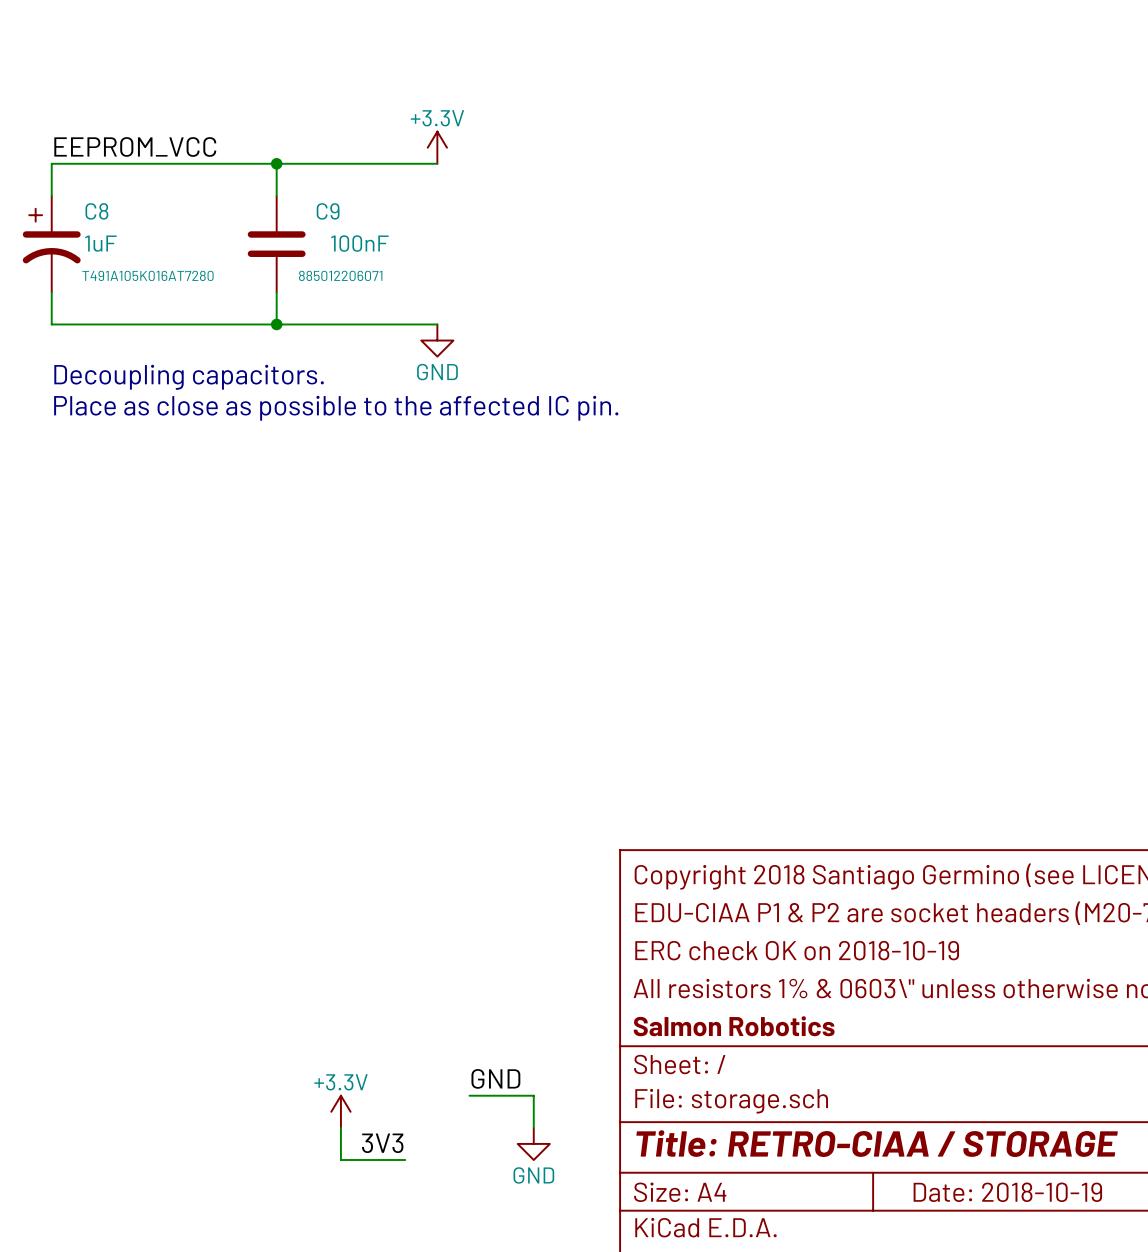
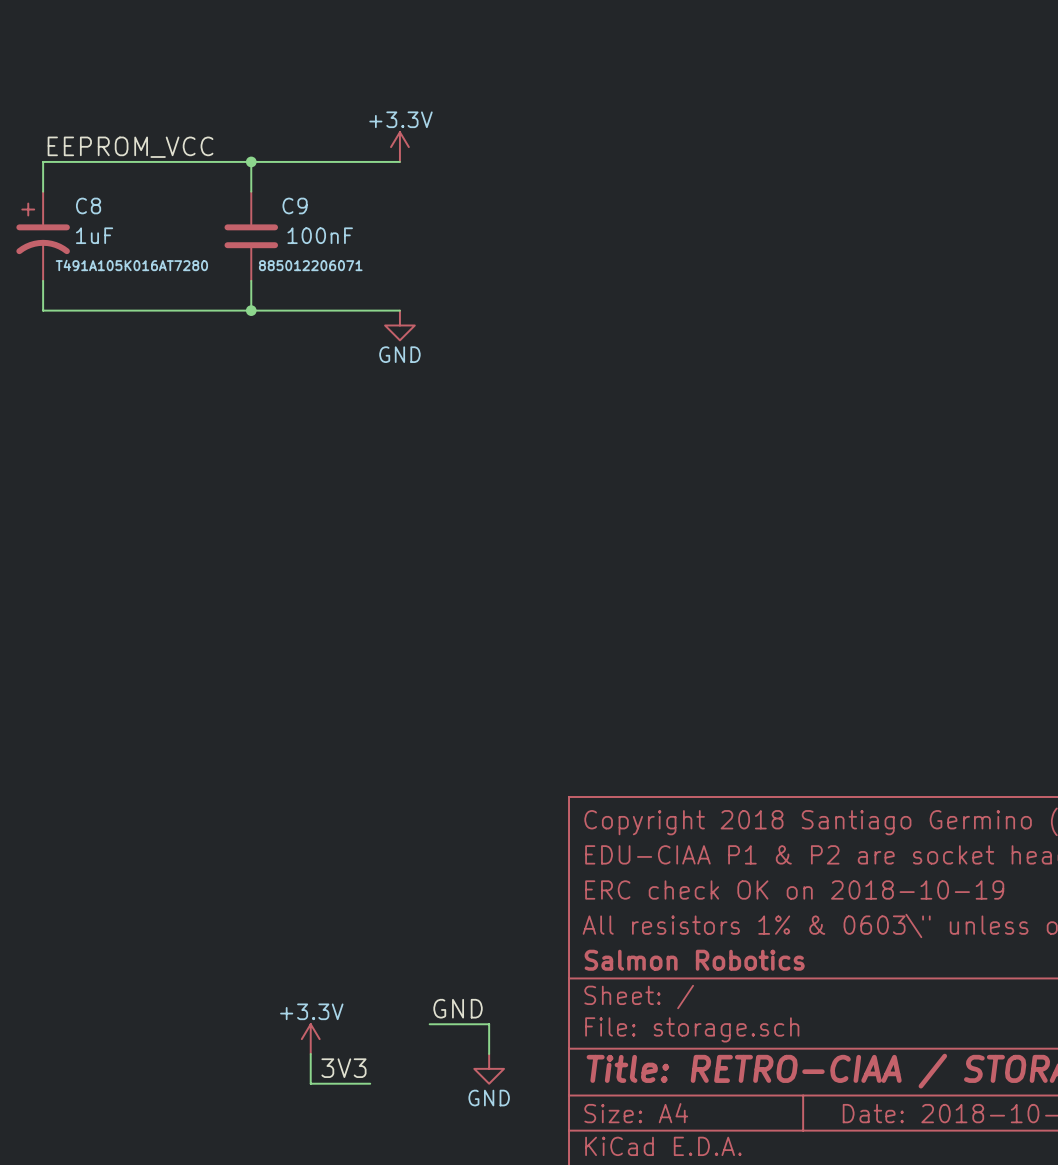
text: Decoupling capacitors. (189, 377) -> none
text: Place as close as possible to the affected IC pin. (336, 408) -> none

